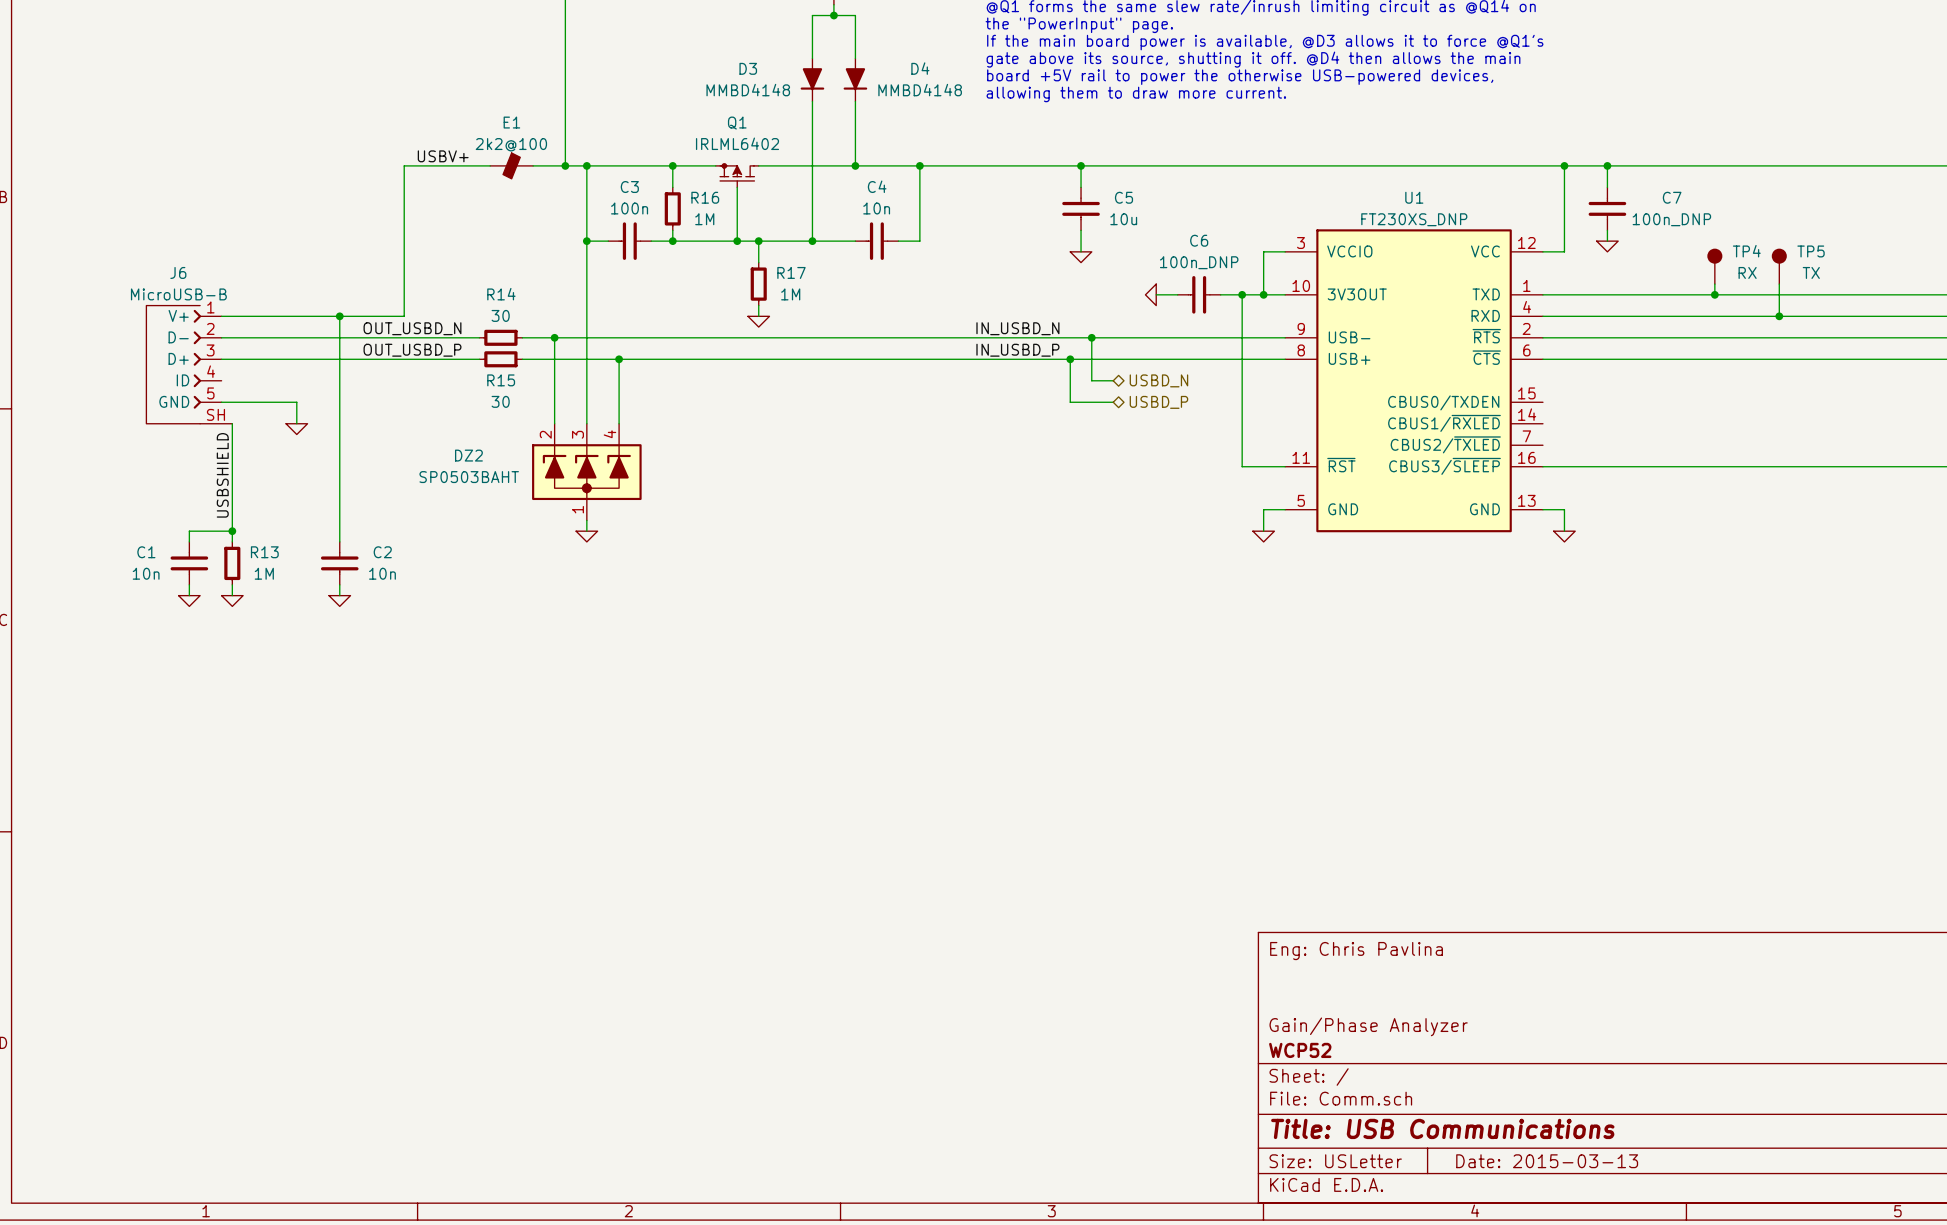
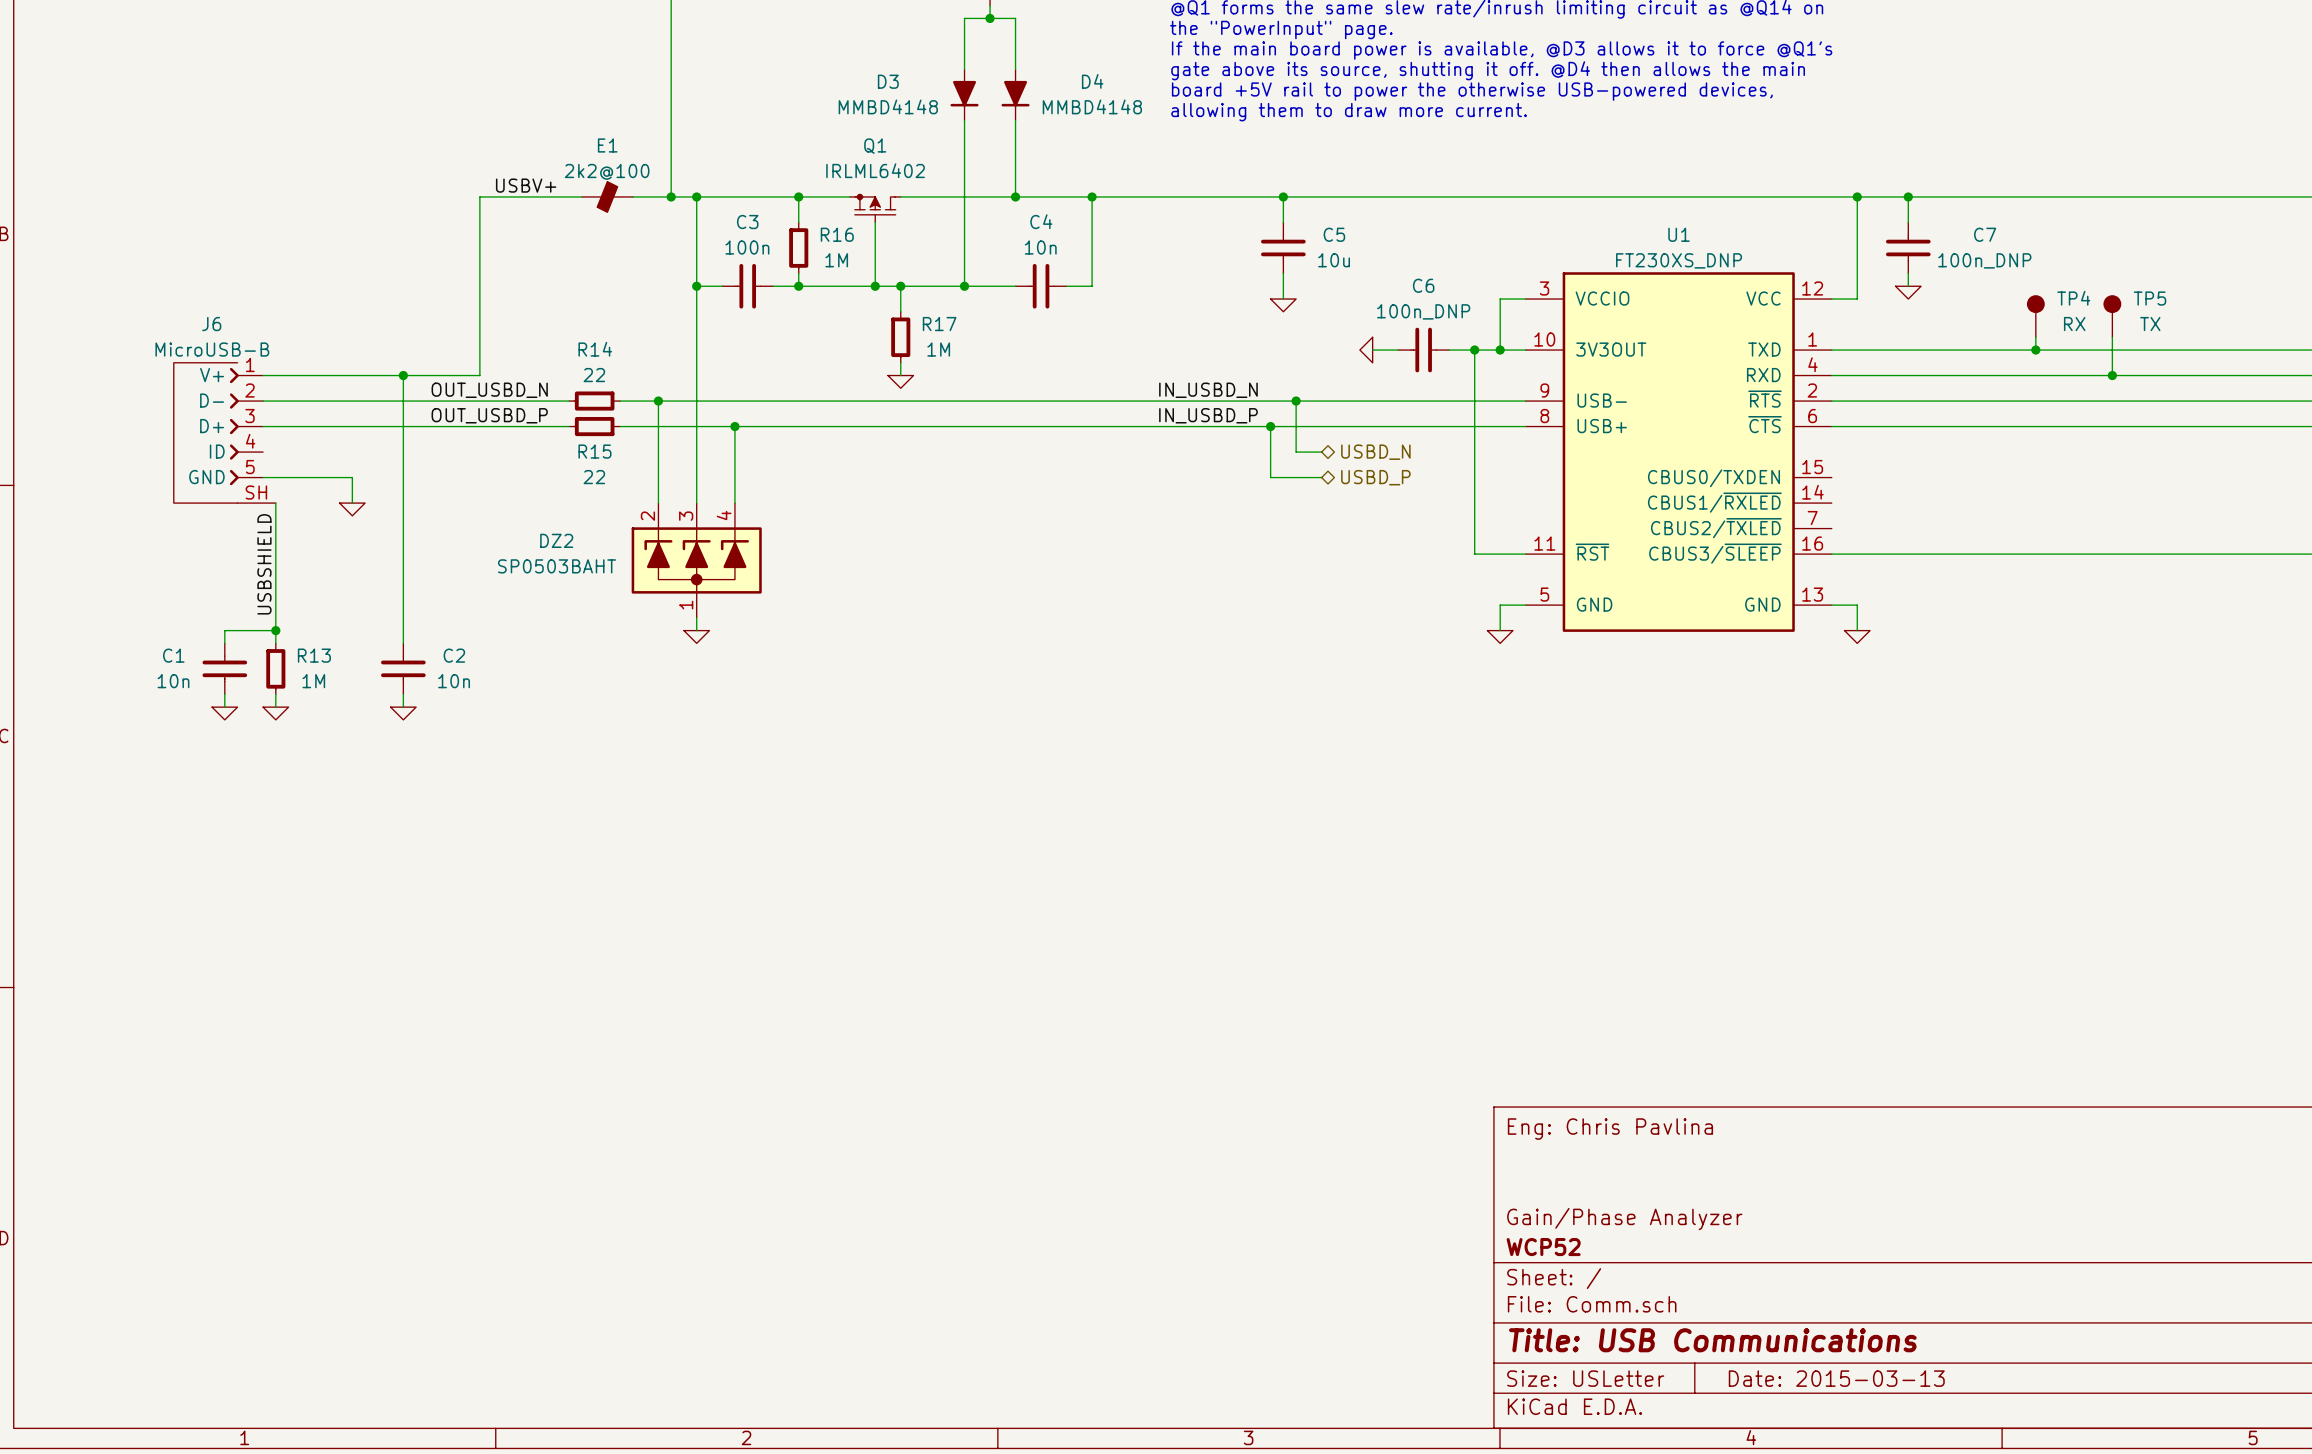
R14 value: 30 (500, 315) -> 22 (594, 375)
R15 value: 30 (500, 401) -> 22 (594, 477)

